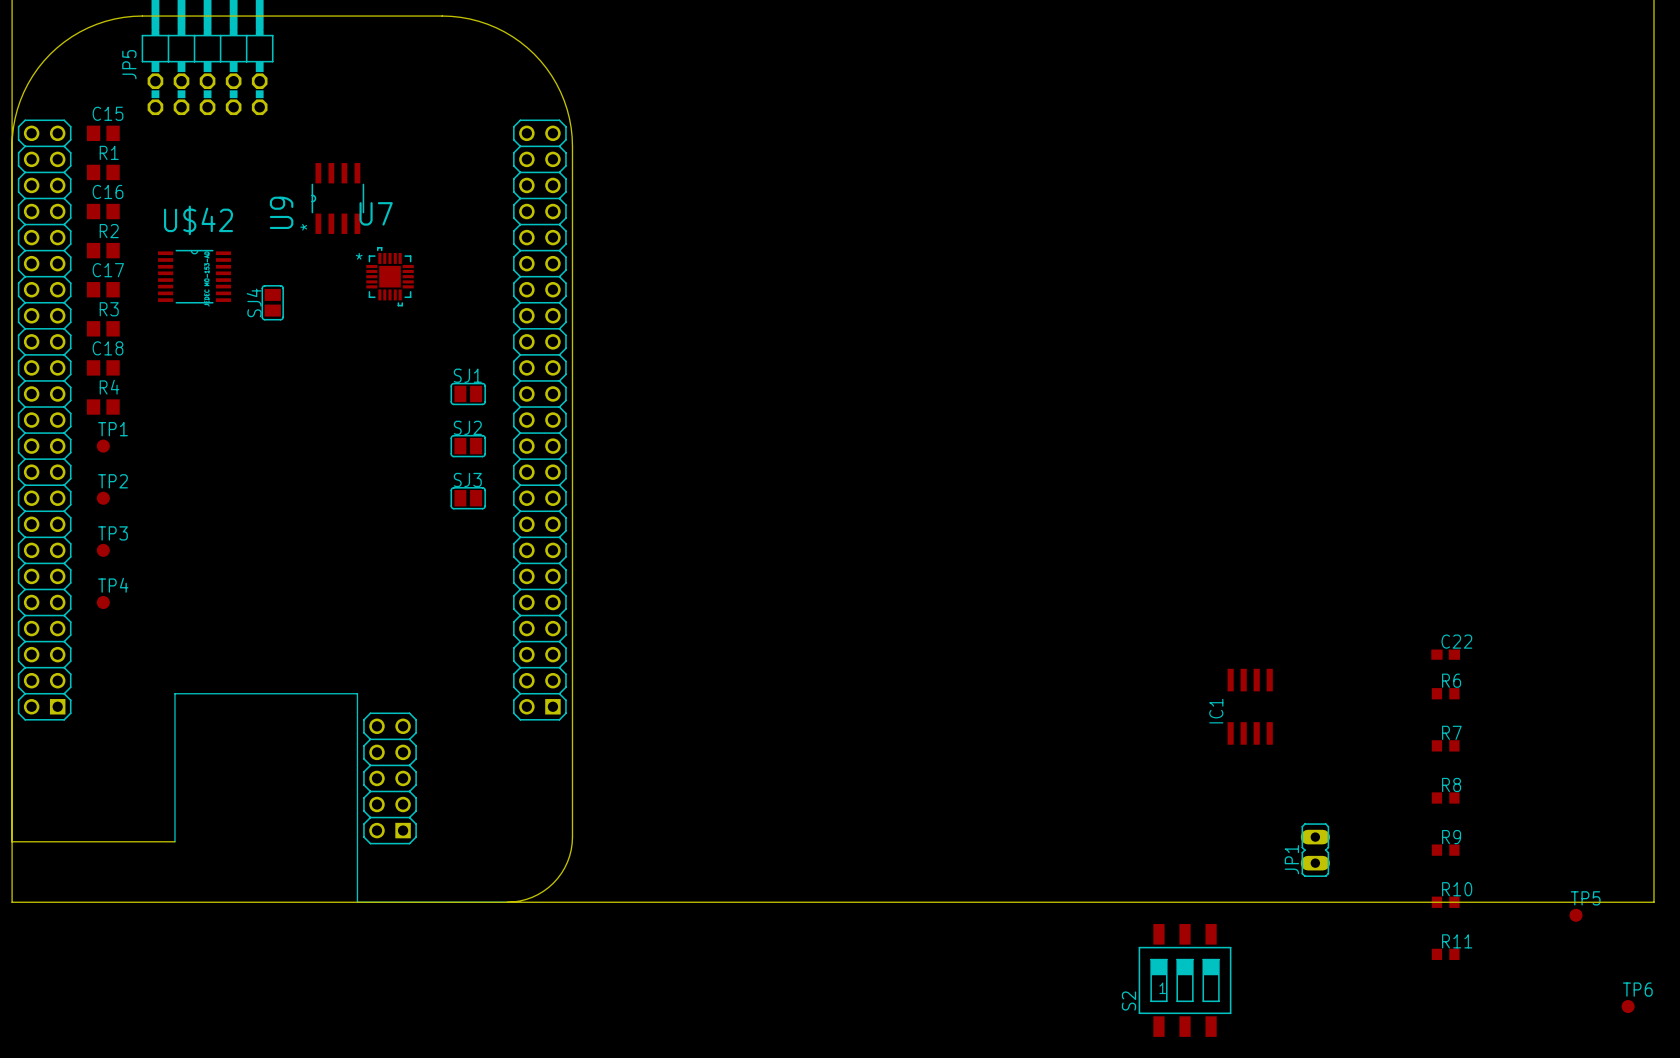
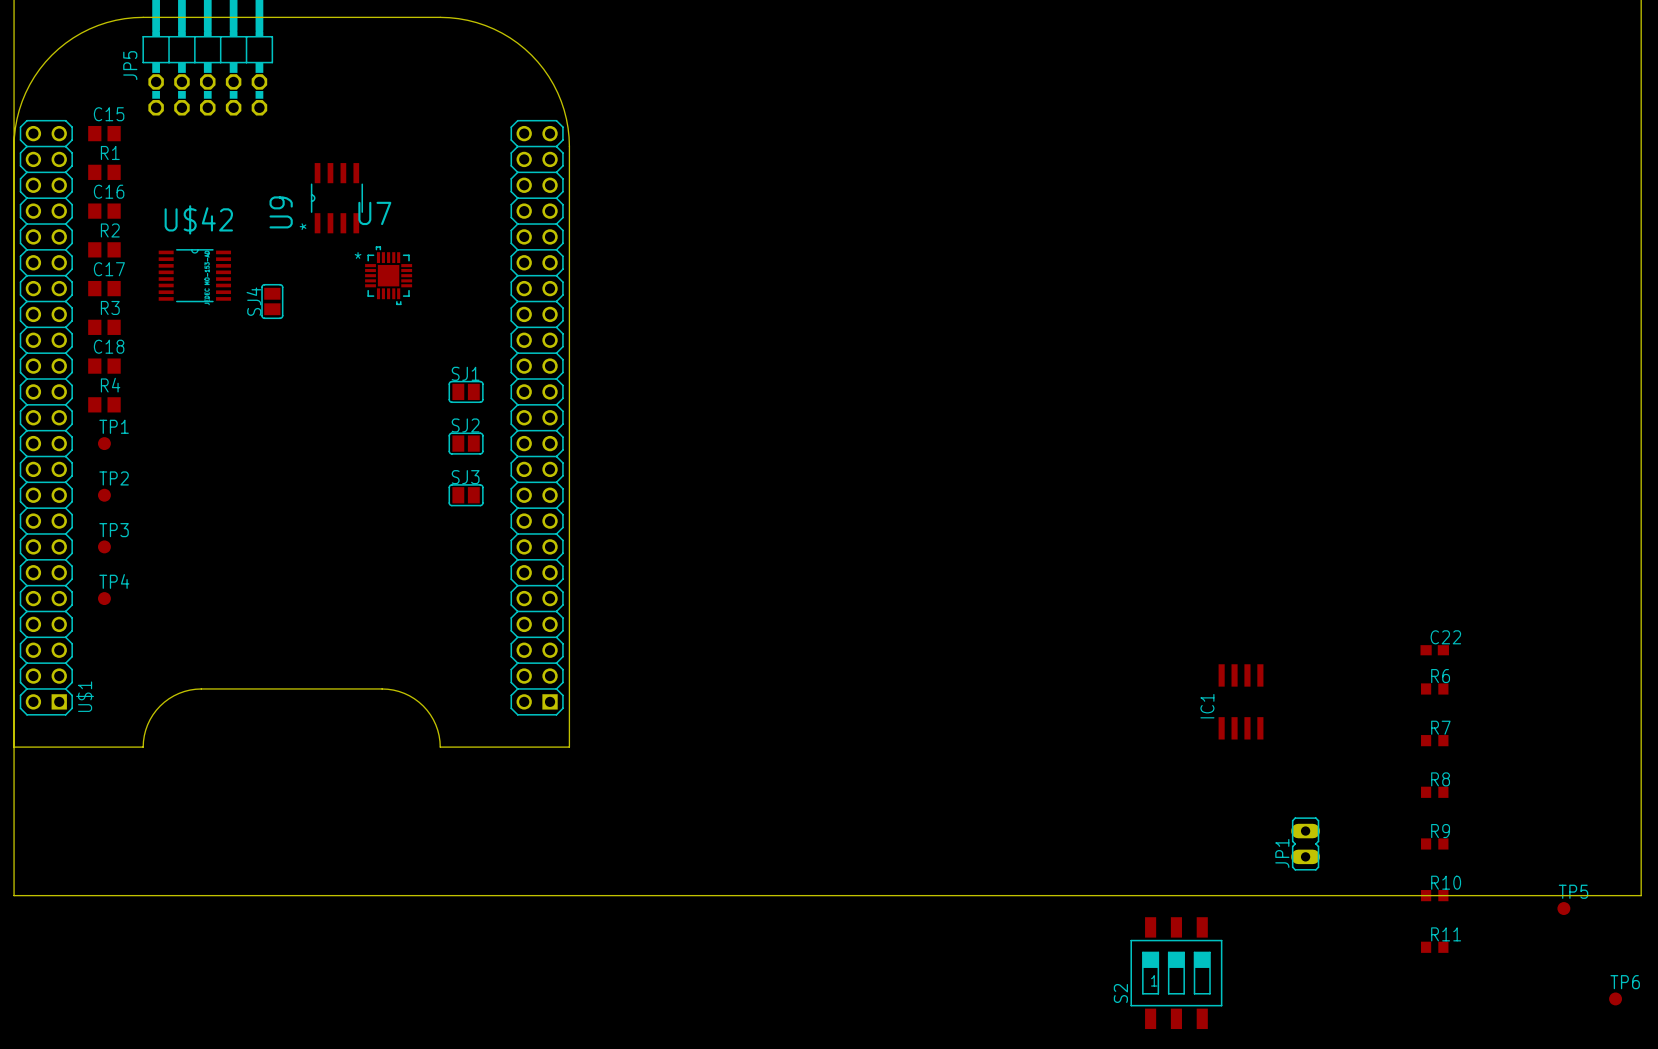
U$1: none -> (291, 382)
part: (292, 459) -> none

